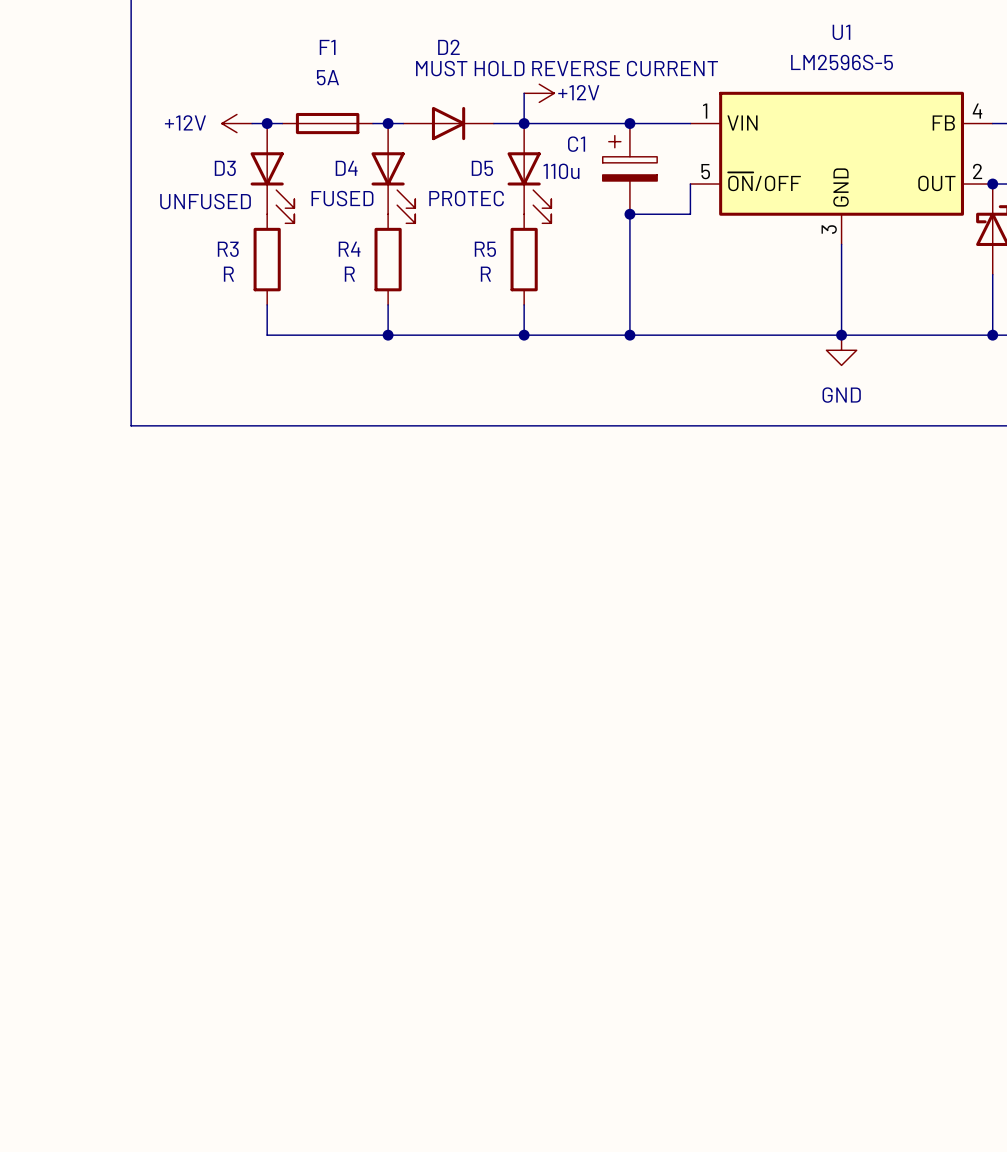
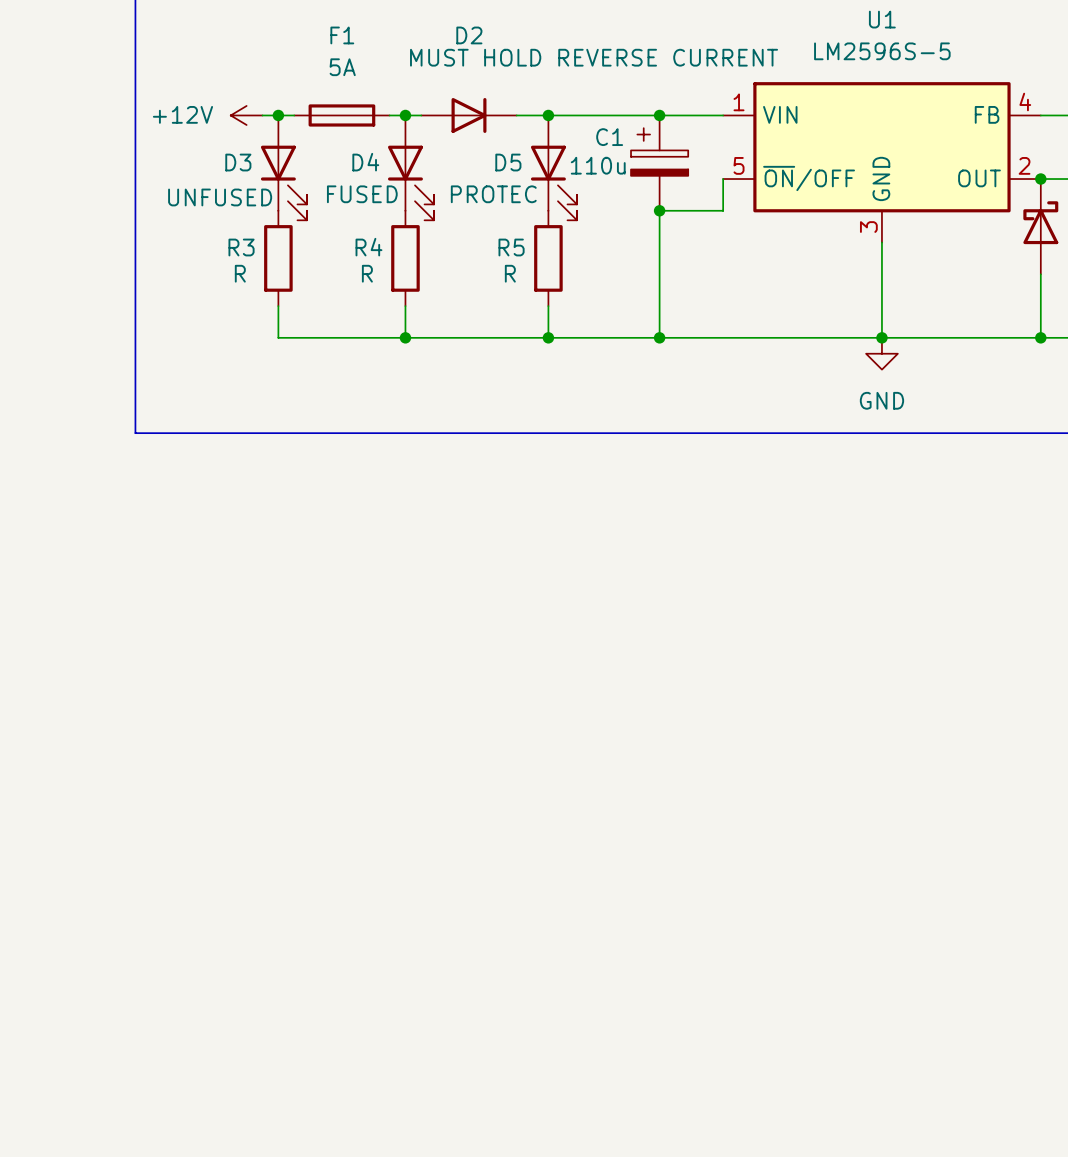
wire: (524, 93) (524, 123) -> none
power symbol: +12V (539, 93) -> none

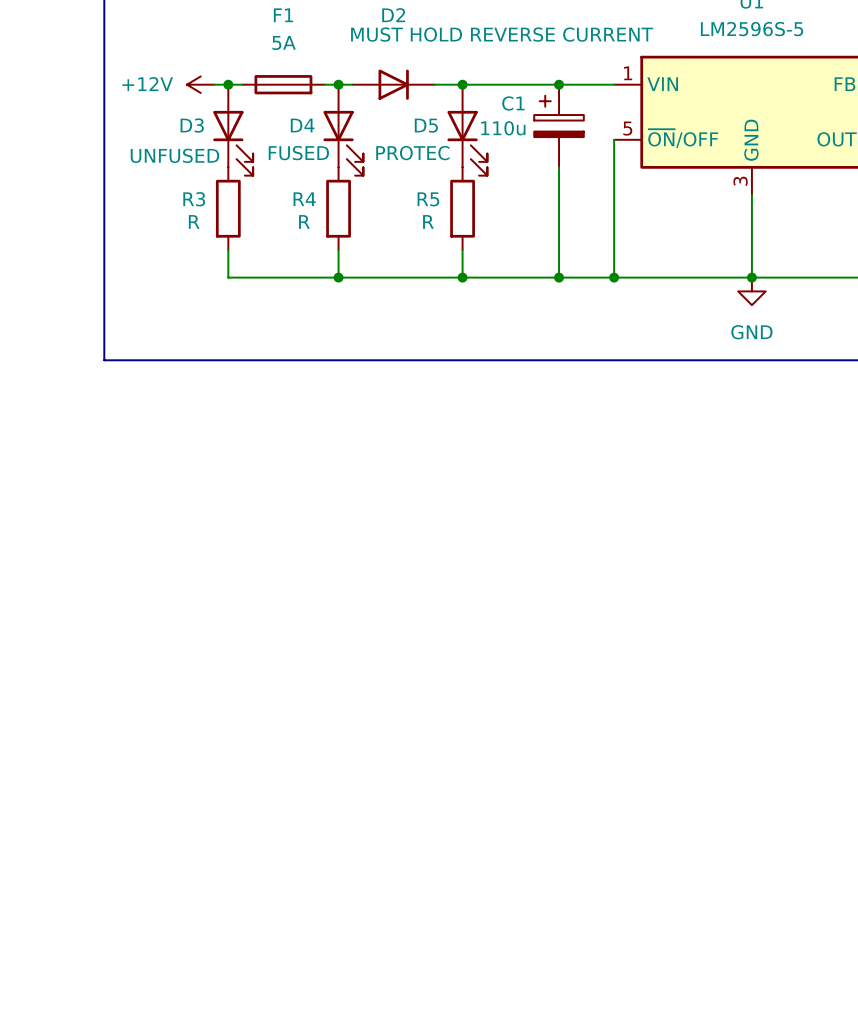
wire: (659, 210) (723, 210) -> (614, 277) (614, 167)
junction: (659, 210) -> none
junction: none -> (614, 277)

